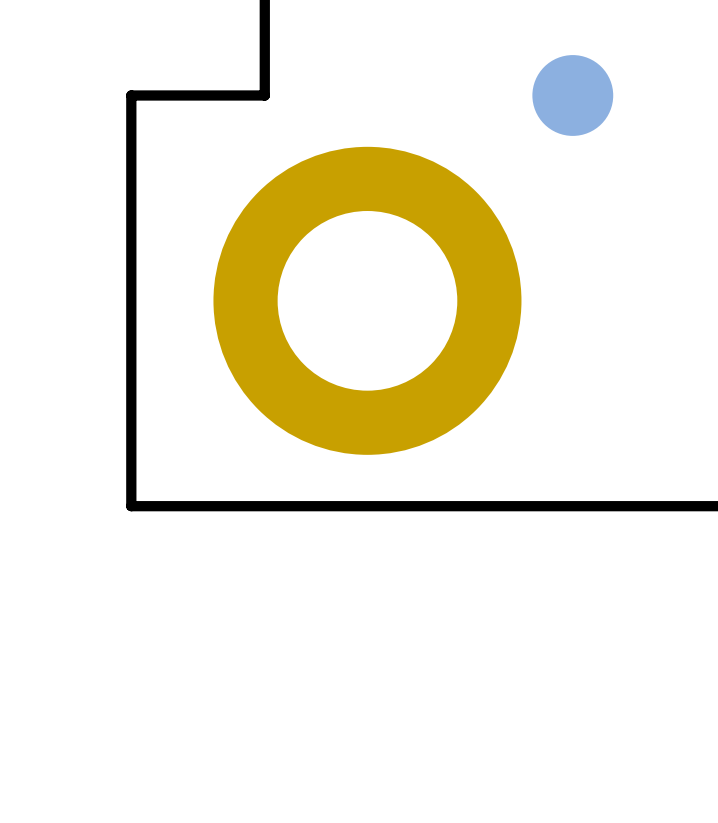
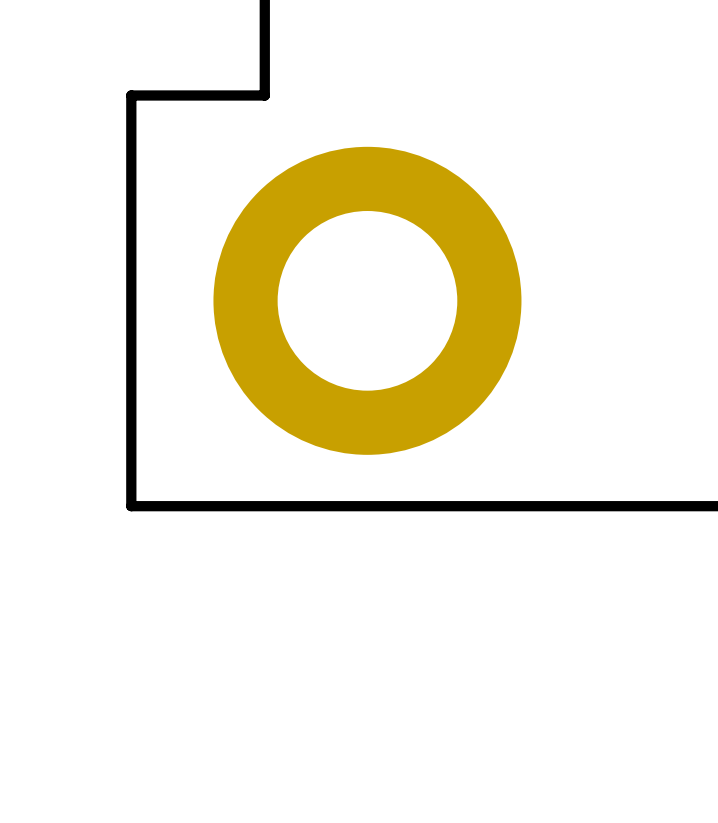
part: (572, 95) -> none

